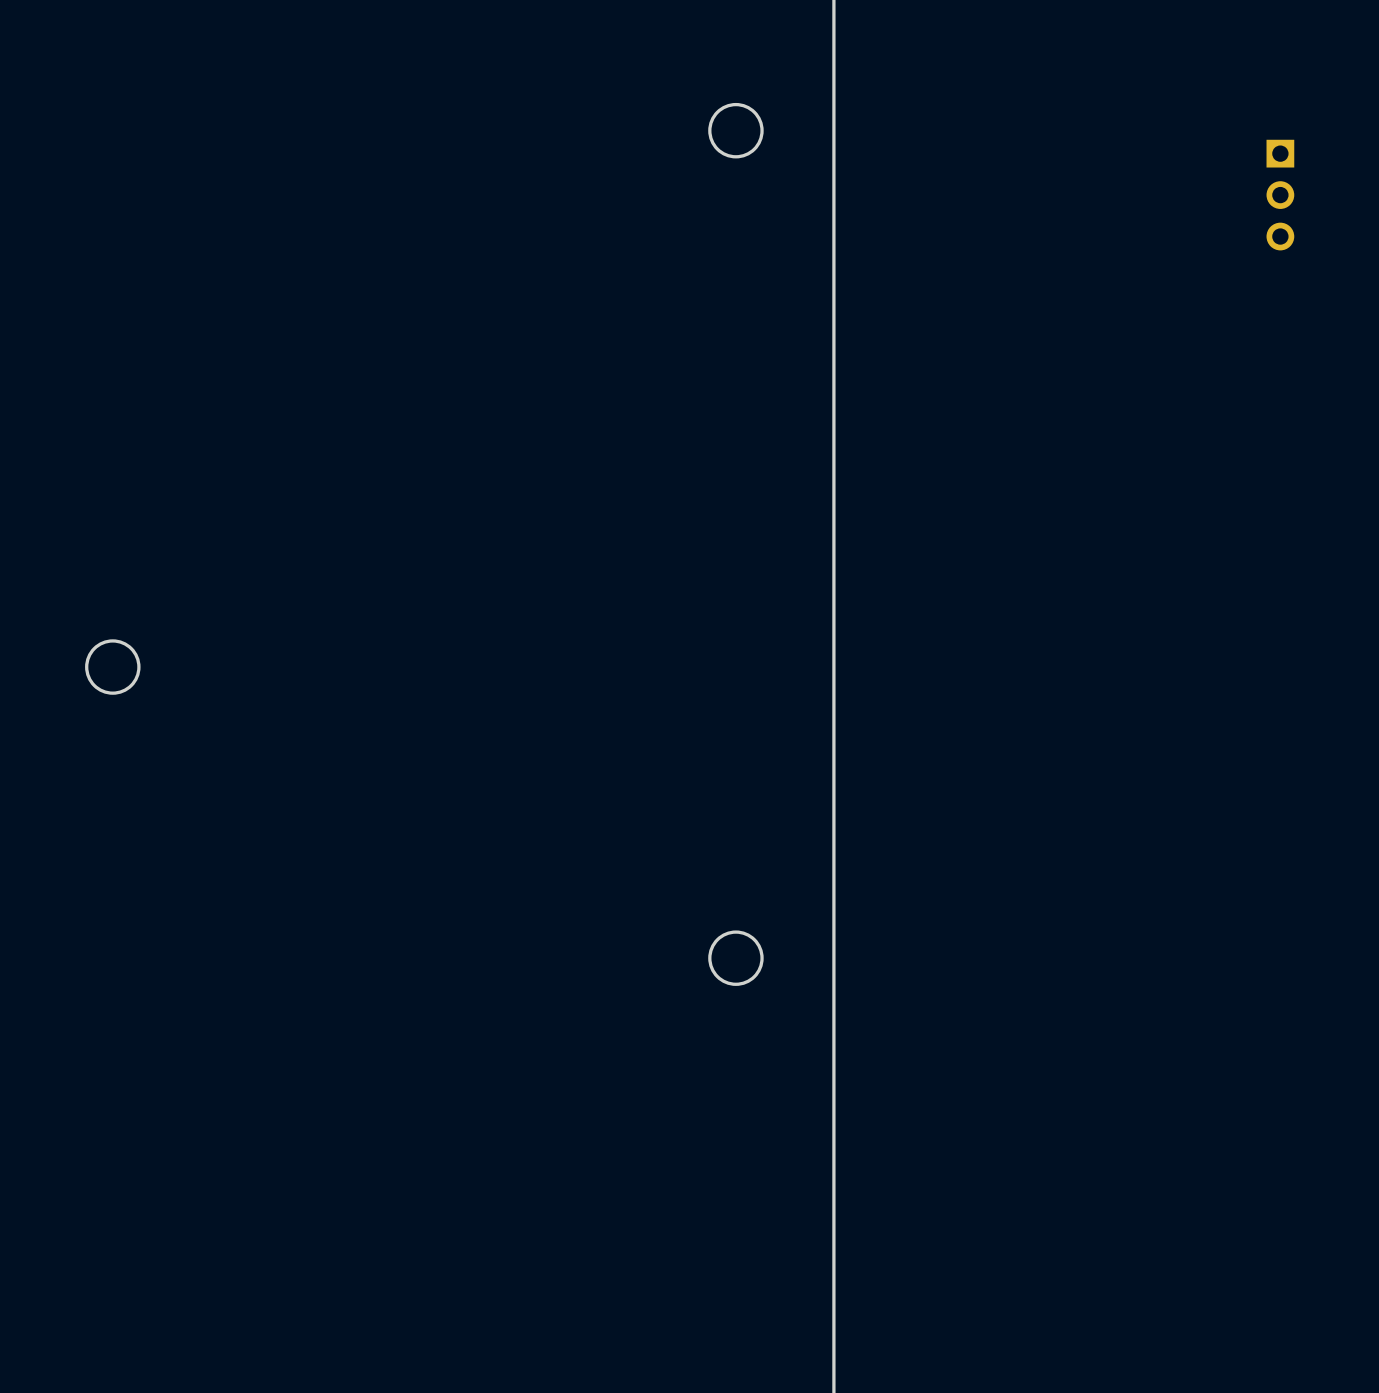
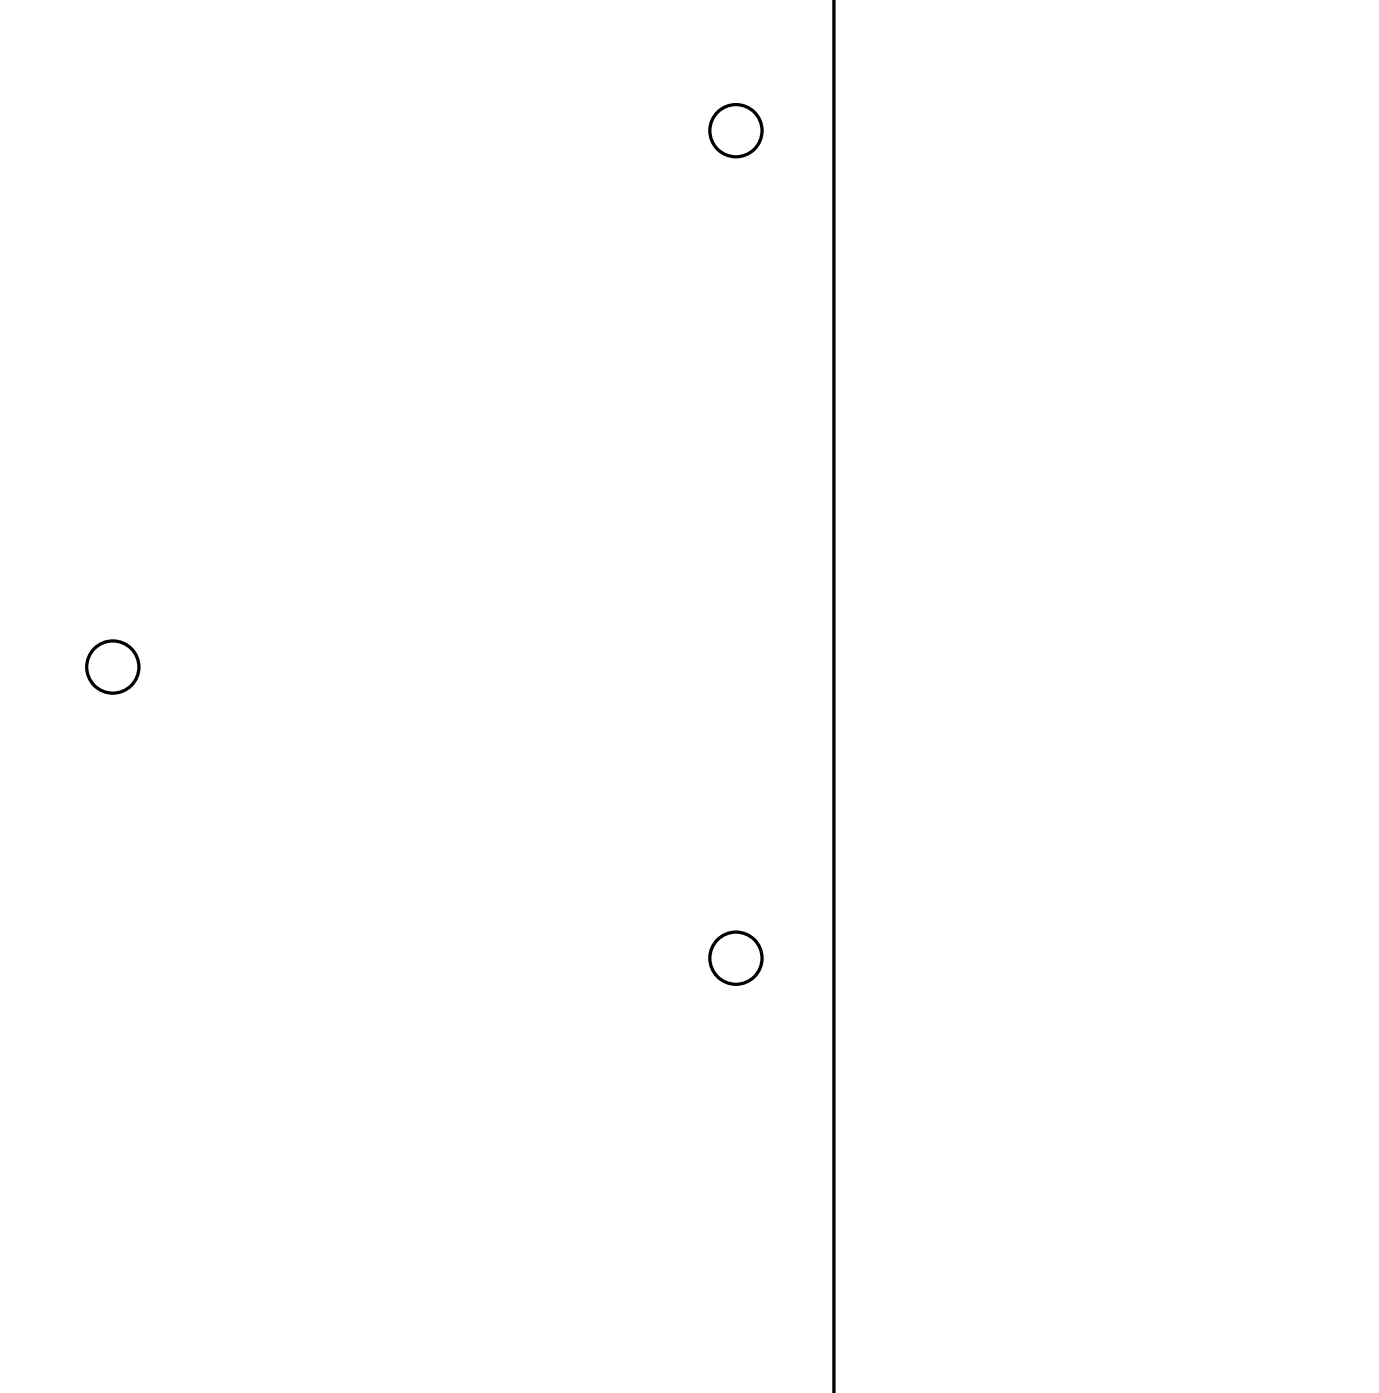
part: (1280, 195) -> none

